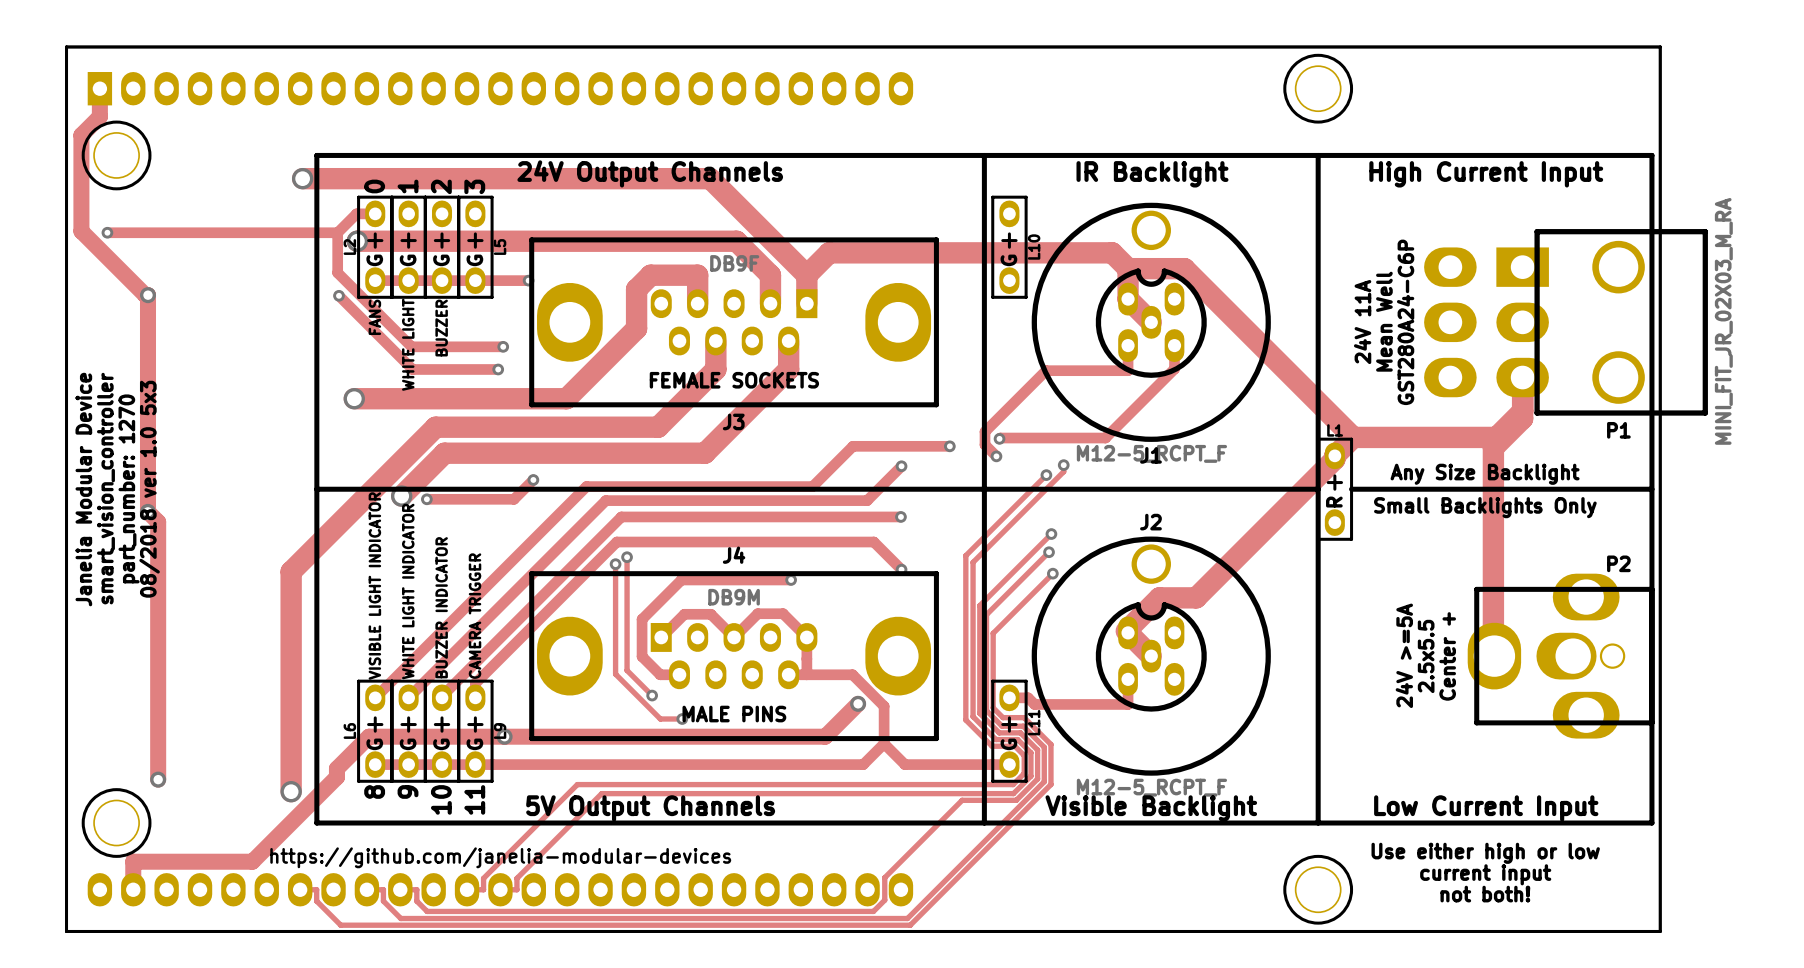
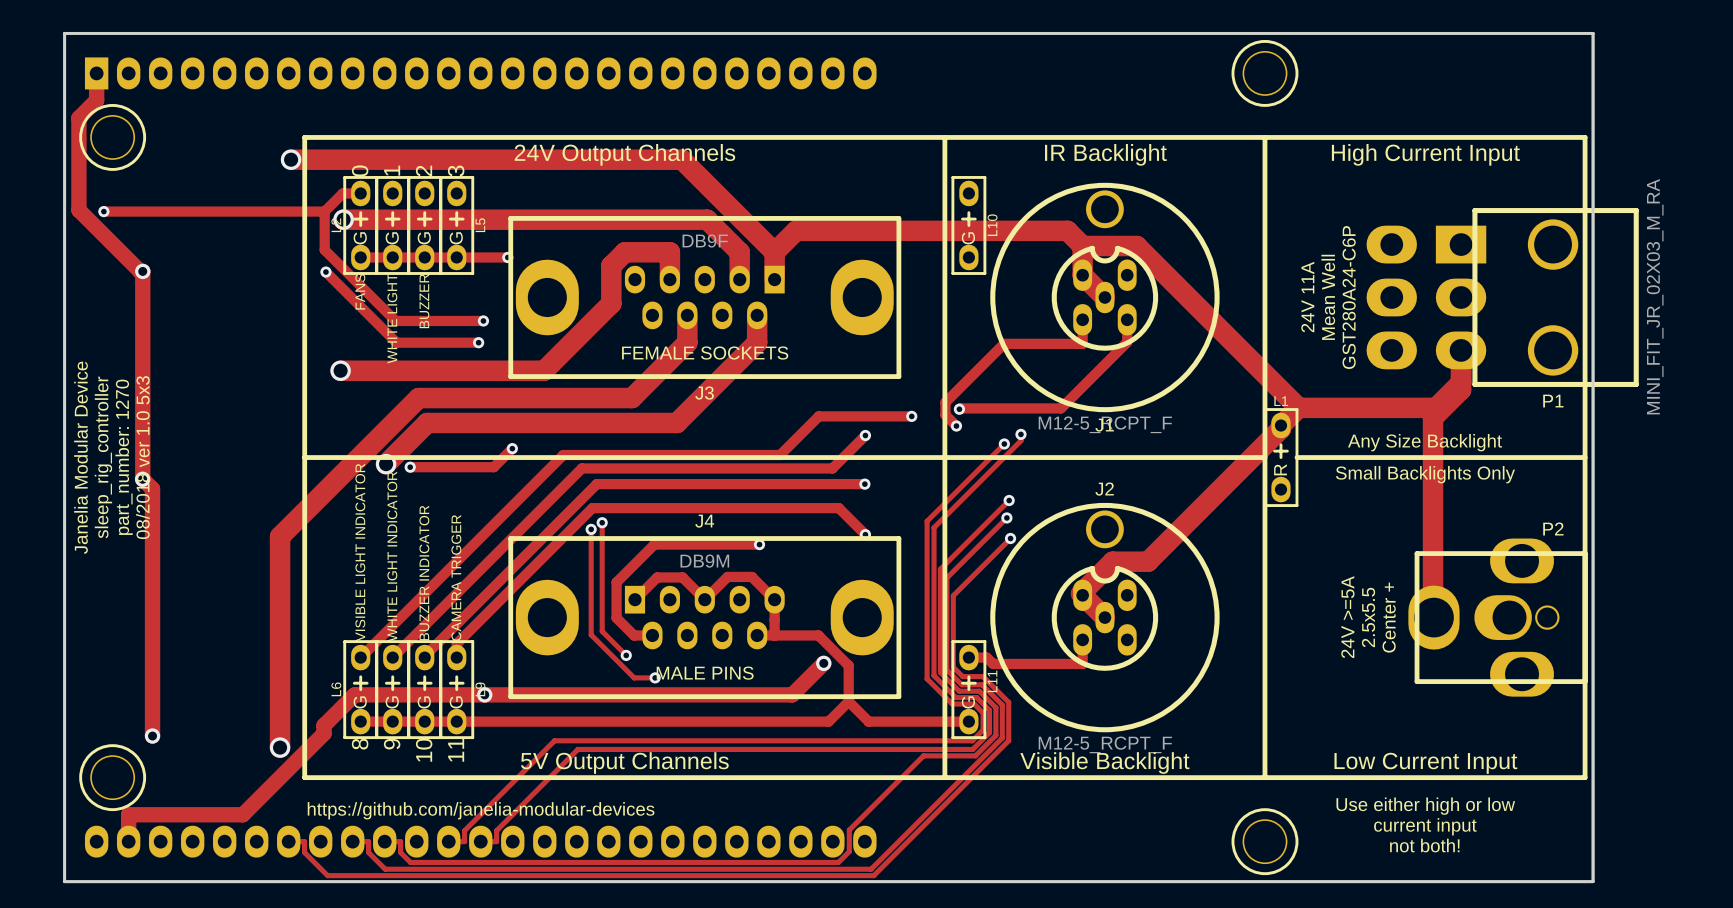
text: smart_vision_controller (105, 488) -> sleep_rig_controller (103, 457)

